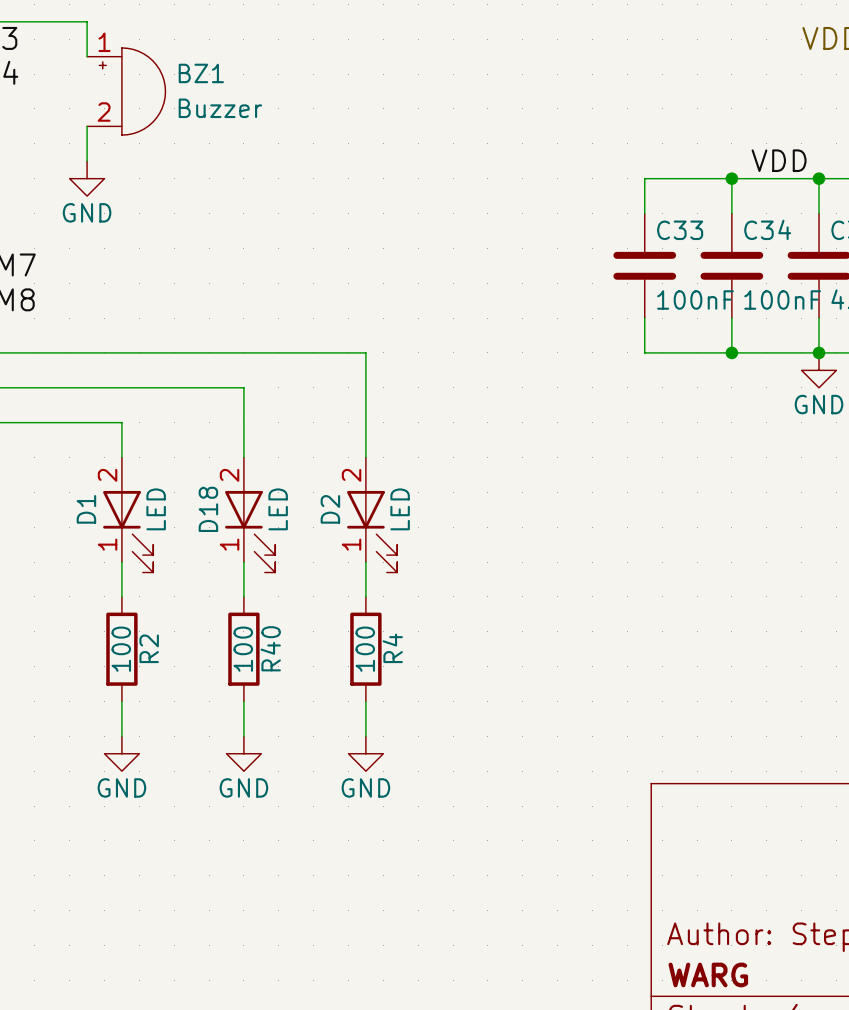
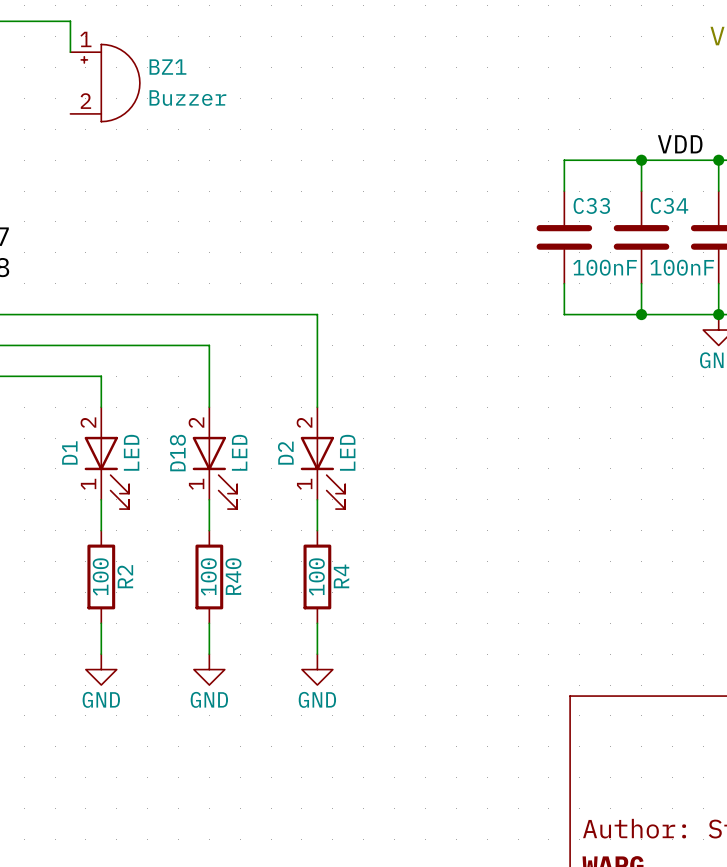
wire: (87, 126) (87, 161) -> none
power symbol: GND (87, 178) -> none

